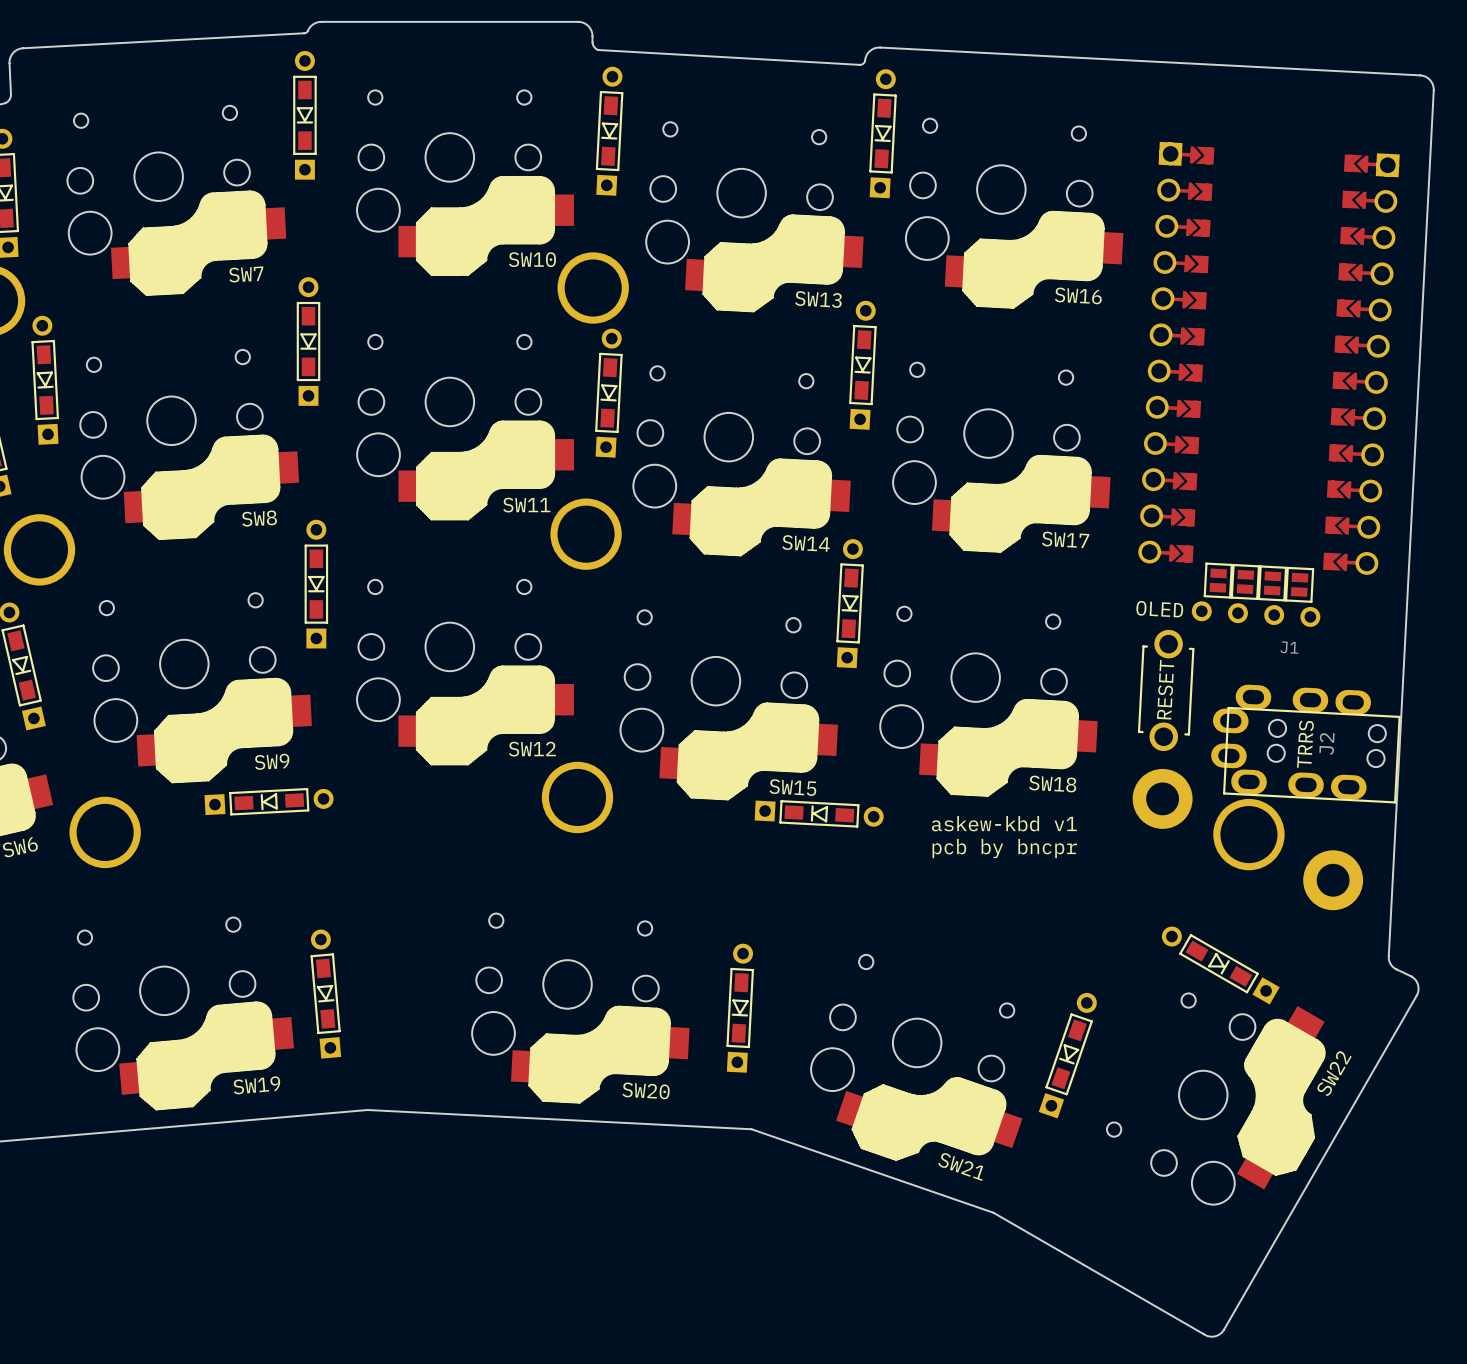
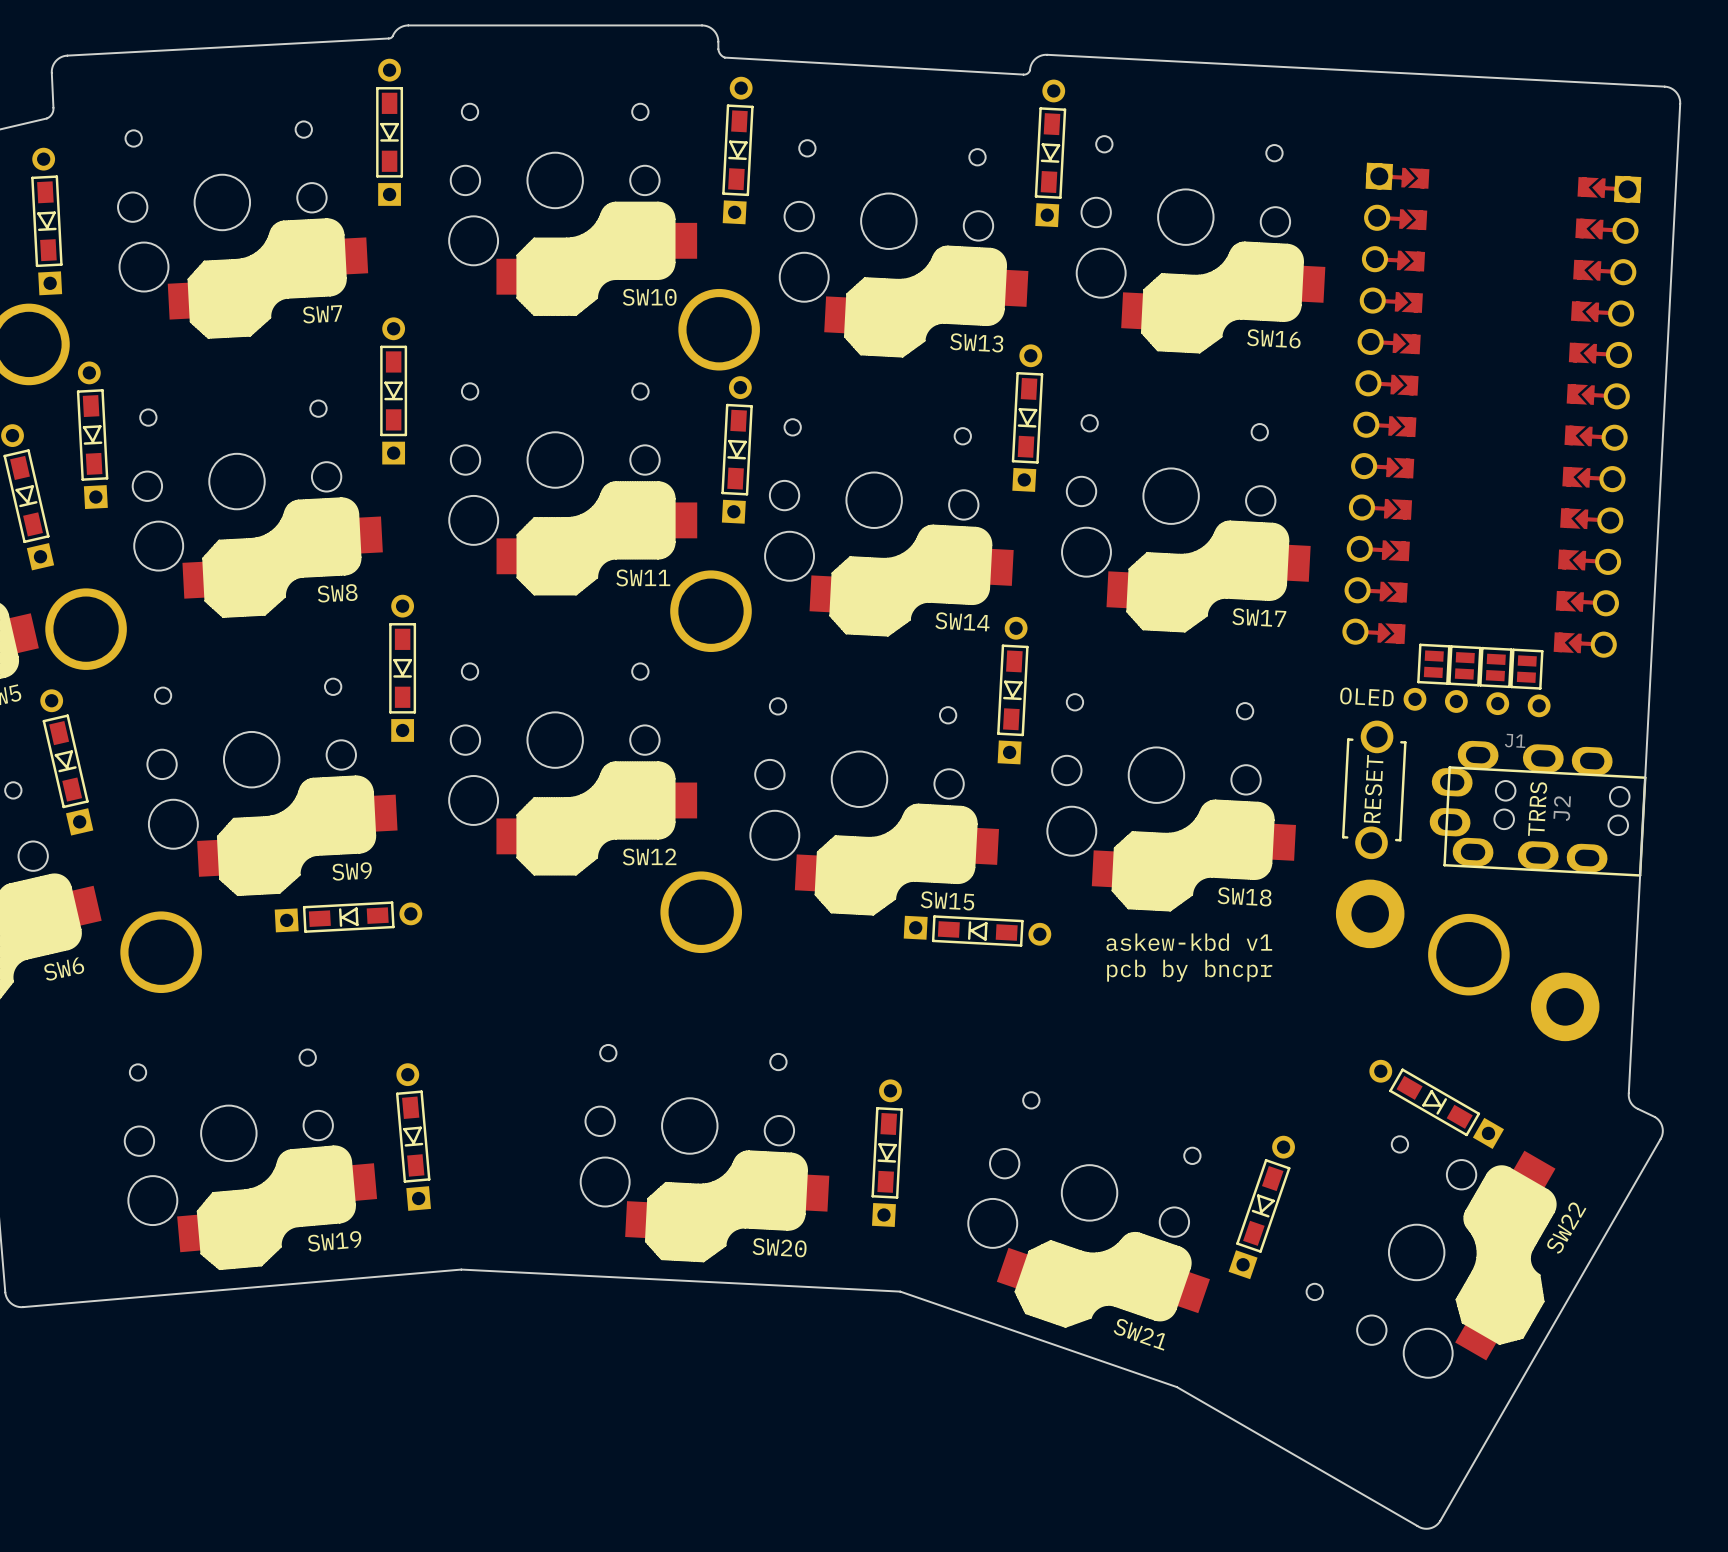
J2 position: (1305, 744) -> (1538, 808)

